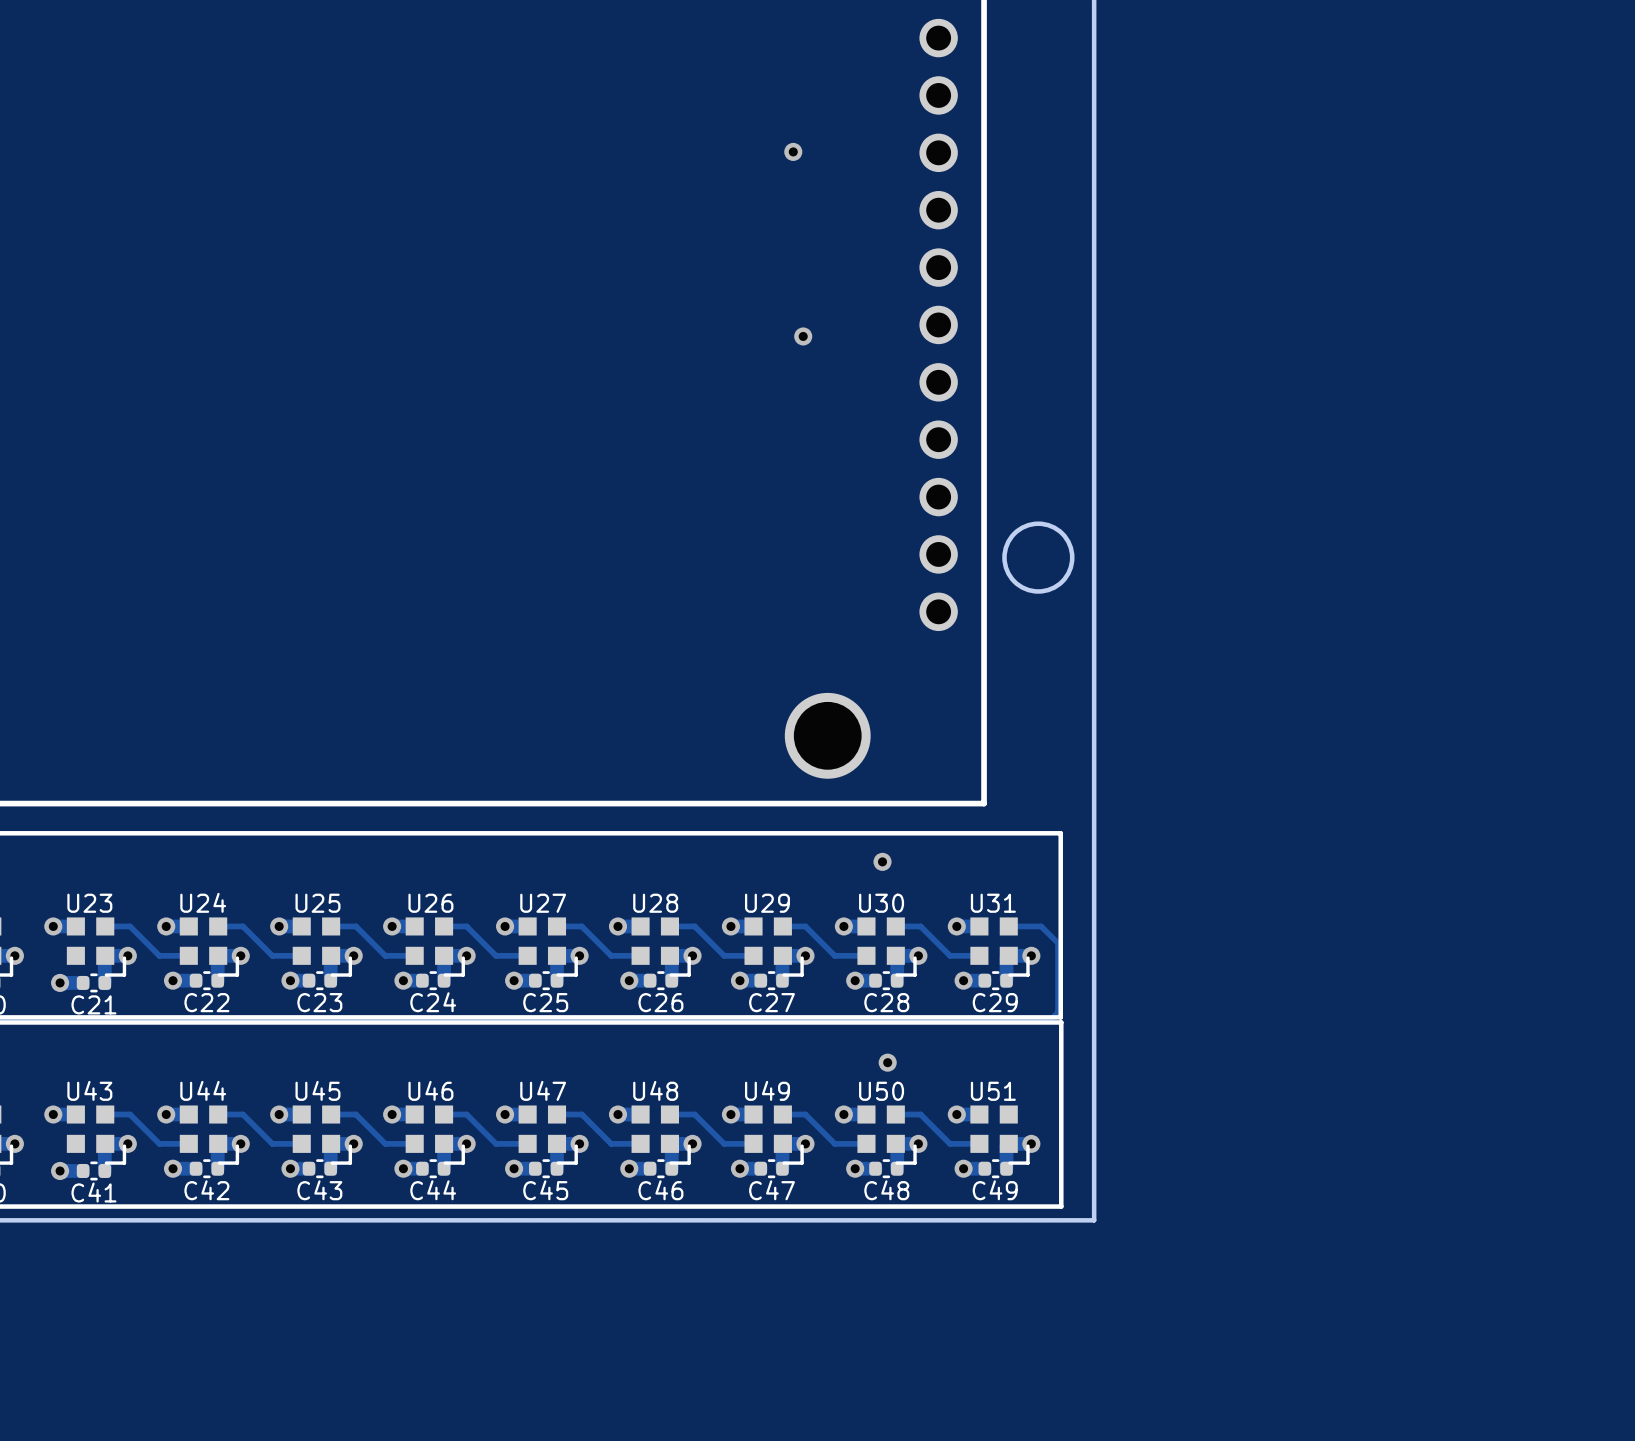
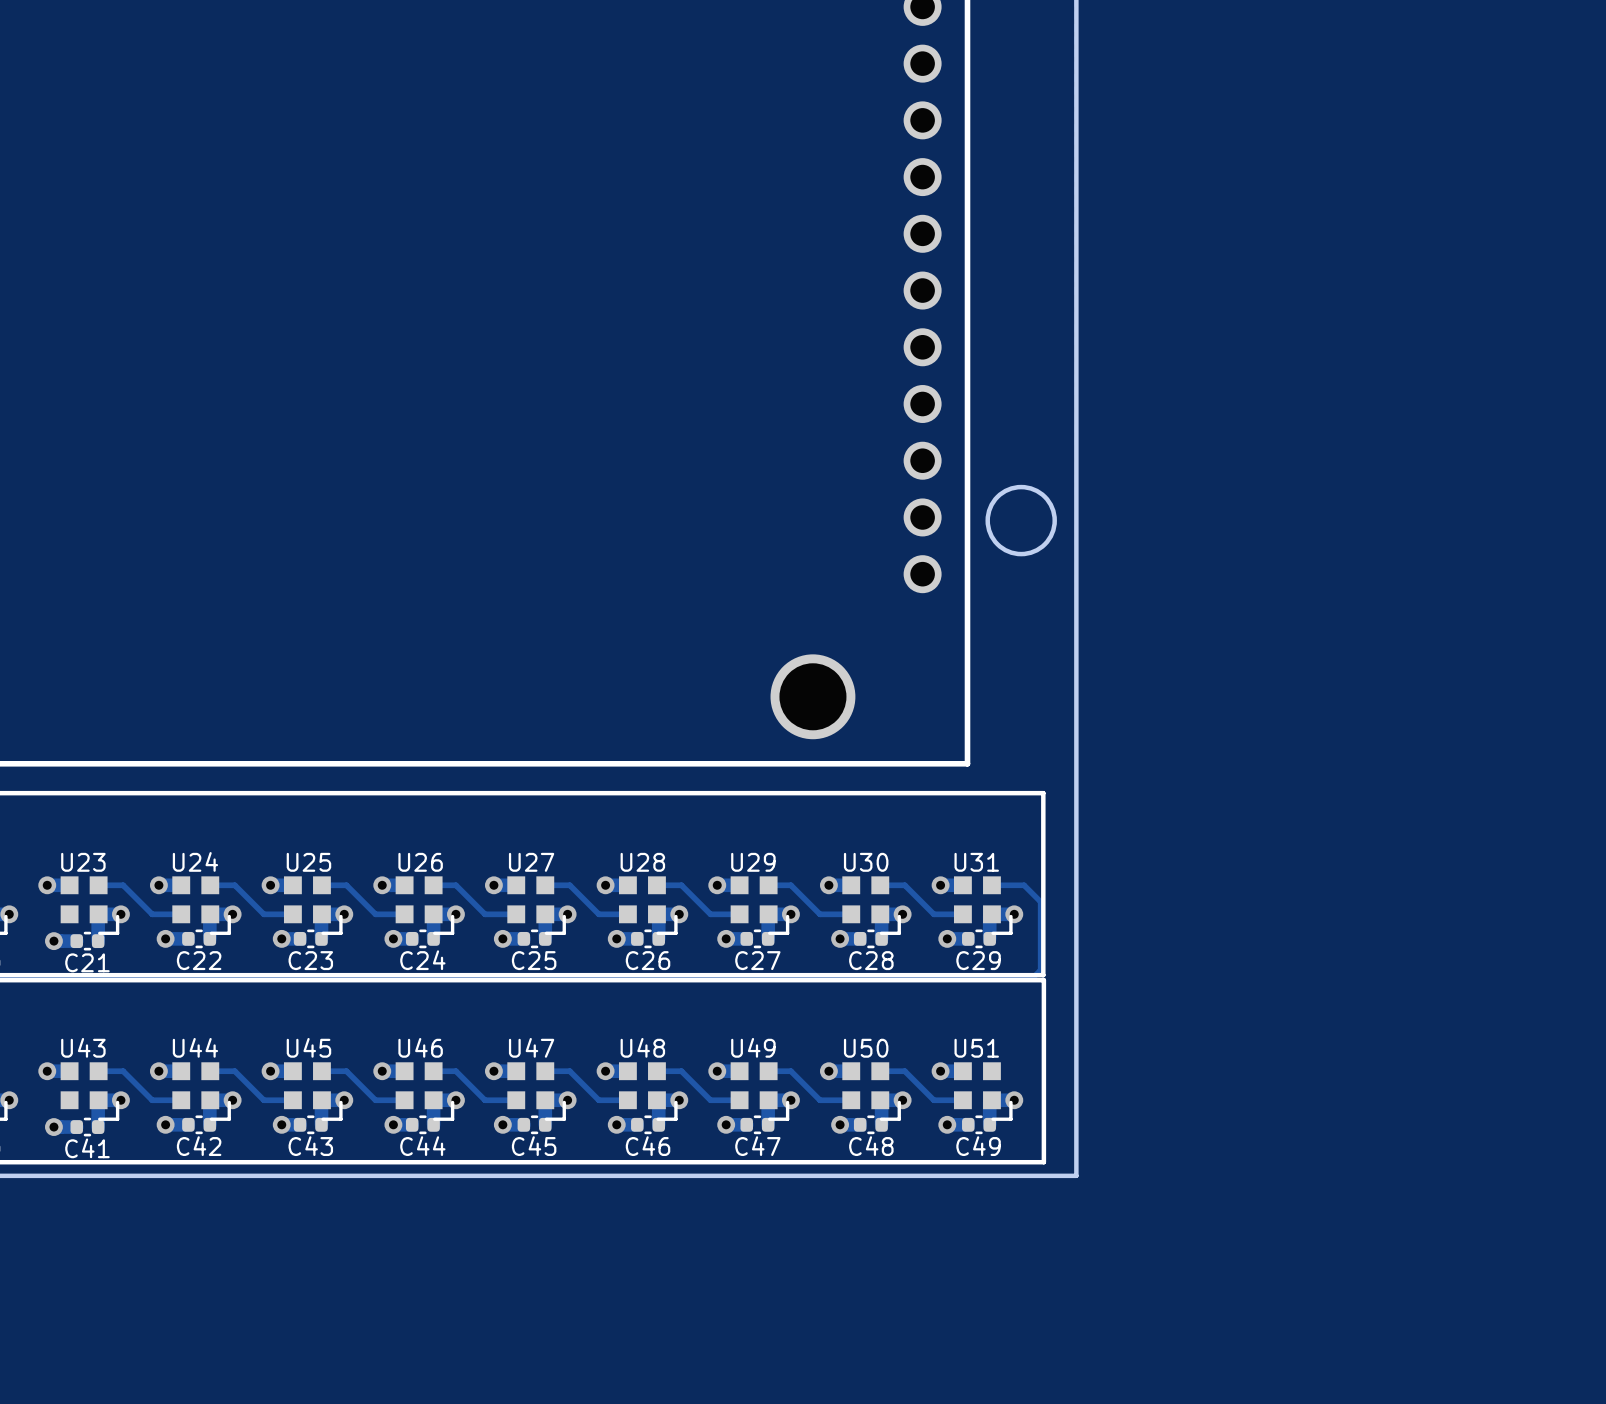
via: (793, 151) -> none
via: (803, 336) -> none
via: (882, 861) -> none
via: (887, 1062) -> none

